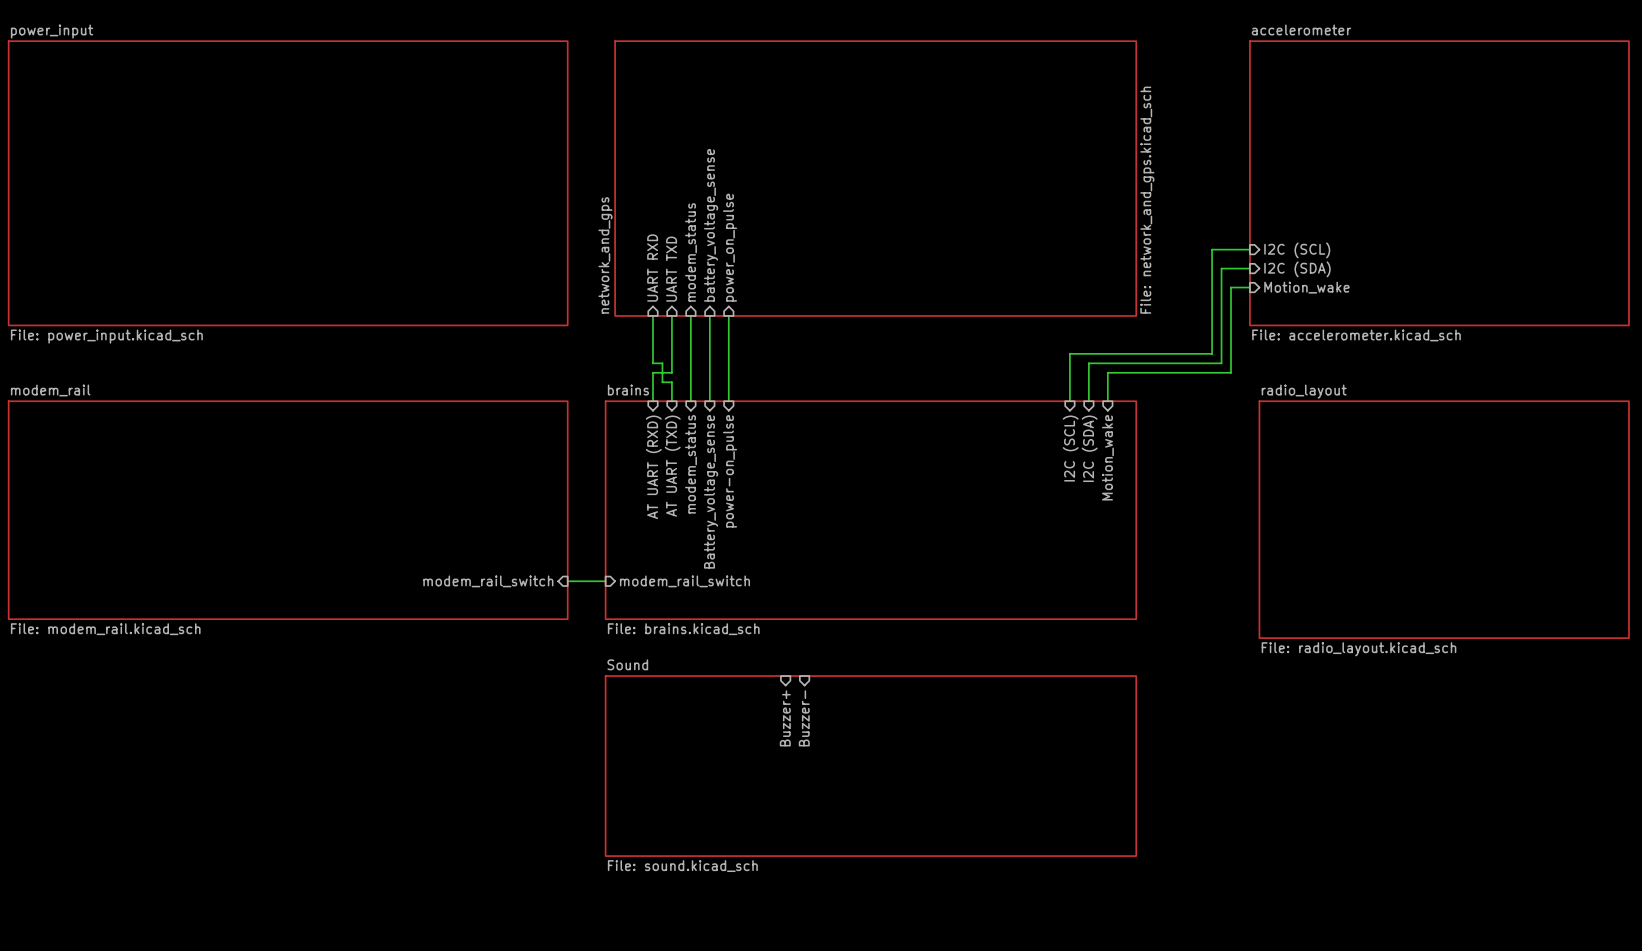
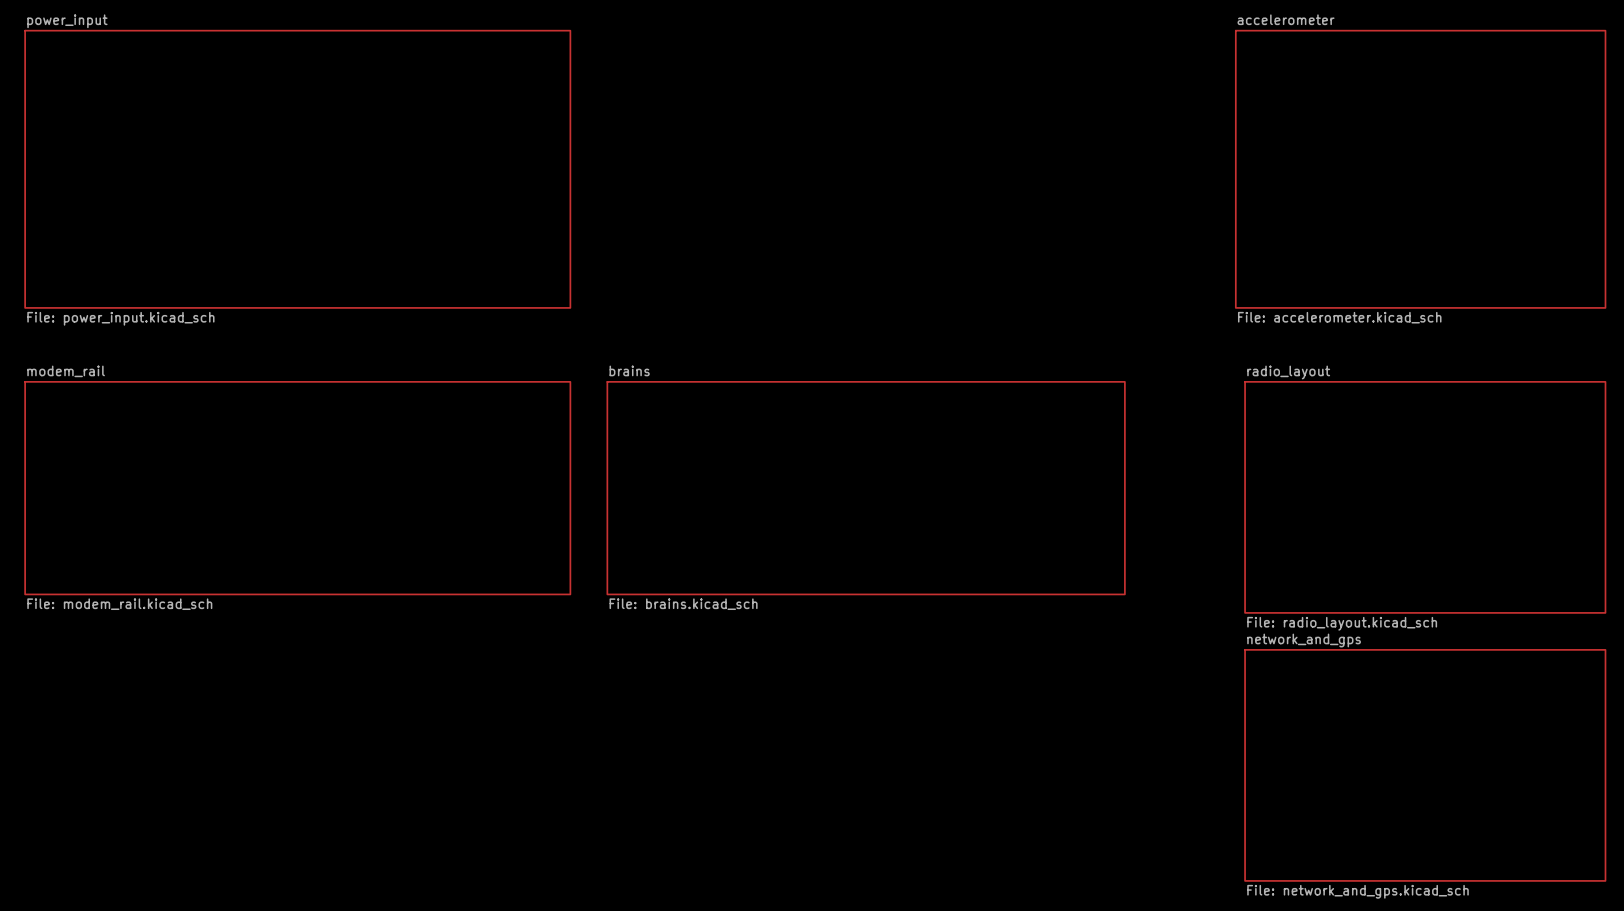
sheet network_and_gps: File: network_and_gps.kicad_sch (875, 178) -> none
sheet pin: battery_voltage_sense (711, 225) -> none
sheet pin: power_on_pulse (730, 247) -> none
wire: (1249, 249) (1212, 249) (1212, 353) (1069, 353) (1069, 401) -> none
sheet pin: I2C (SCL) (1297, 250) -> none
sheet pin: modem_status (690, 252) -> none
sheet pin: UART RXD (652, 267) -> none
wire: (1249, 268) (1221, 268) (1221, 363) (1088, 363) (1088, 401) -> none
sheet pin: UART TXD (671, 269) -> none
sheet pin: I2C (SDA) (1297, 269) -> none
wire: (1249, 287) (1231, 287) (1231, 372) (1107, 372) (1107, 401) -> none
sheet pin: Motion_wake (1306, 287) -> none
wire: (652, 315) (652, 363) (662, 363) (662, 382) (671, 382) (671, 401) -> none
wire: (671, 315) (671, 372) (652, 372) (652, 401) -> none
wire: (690, 315) (690, 401) -> none
wire: (709, 315) (709, 401) -> none
wire: (728, 315) (728, 401) -> none
sheet pin: I2C (SCL) (1070, 448) -> none
sheet pin: I2C (SDA) (1089, 448) -> none
sheet pin: Motion_wake (1107, 457) -> none
sheet pin: modem_status (690, 464) -> none
sheet pin: AT UART (TXD) (672, 466) -> none
sheet pin: AT UART (RXD) (653, 467) -> none
sheet pin: power-on_pulse (730, 471) -> none
sheet pin: Battery_voltage_sense (711, 491) -> none
sheet pin: modem_rail_switch (488, 581) -> none
wire: (567, 581) (605, 581) -> none
sheet pin: modem_rail_switch (684, 581) -> none
sheet pin: Buzzer+ (785, 718) -> none
sheet pin: Buzzer- (804, 718) -> none
sheet Sound: File: sound.kicad_sch (870, 766) -> none
sheet network_and_gps: none -> File: network_and_gps.kicad_sch (1425, 765)

